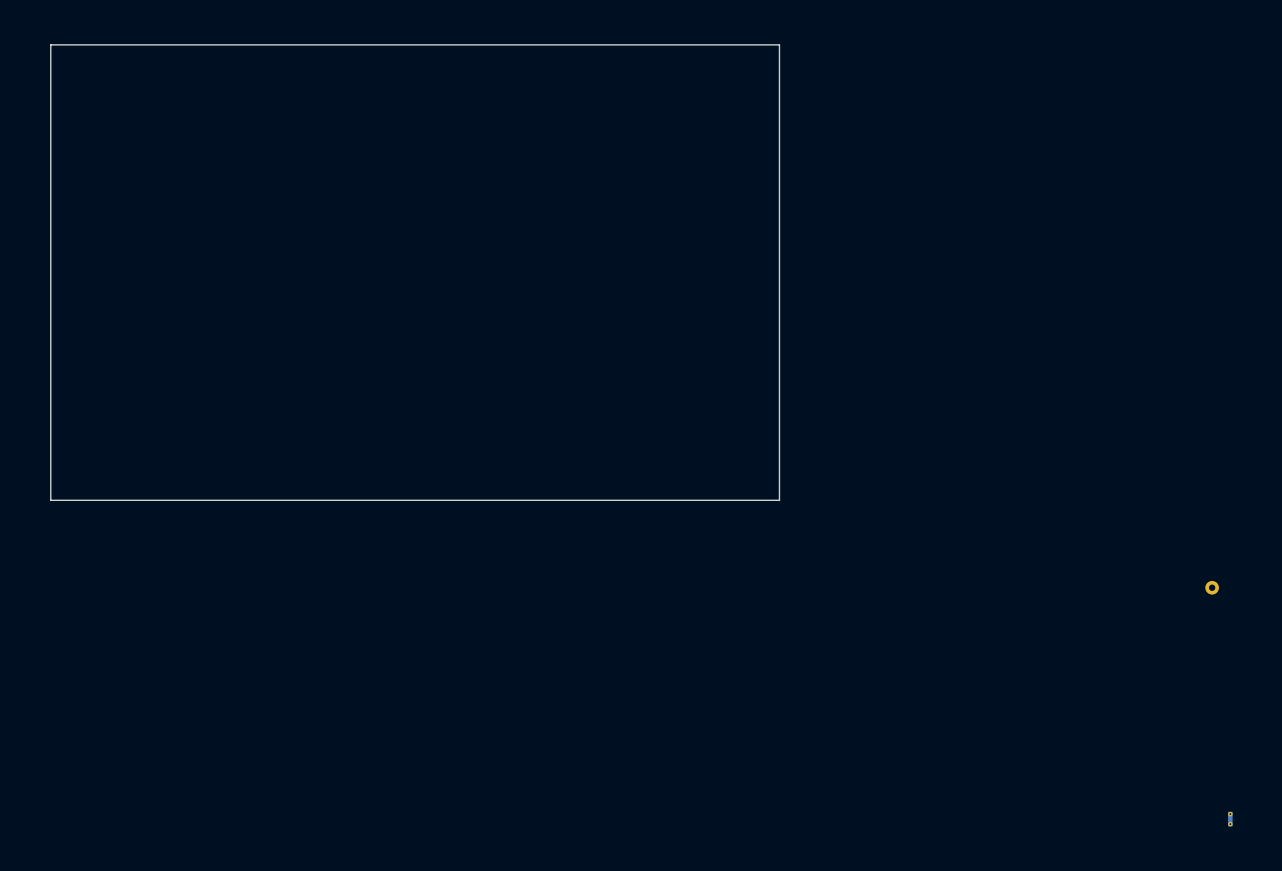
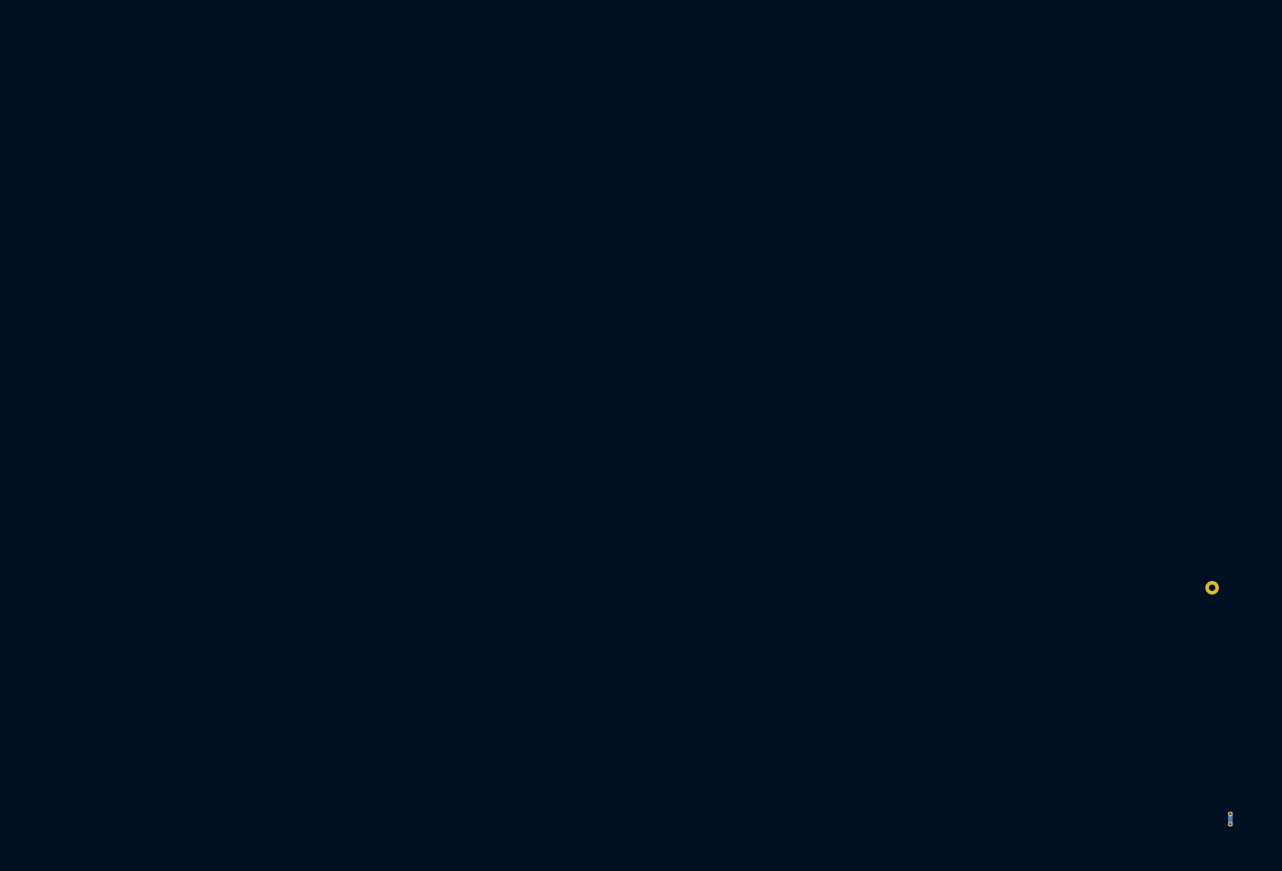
board edge: (779, 44) (50, 44) (50, 500) (779, 500) (779, 44) -> none

